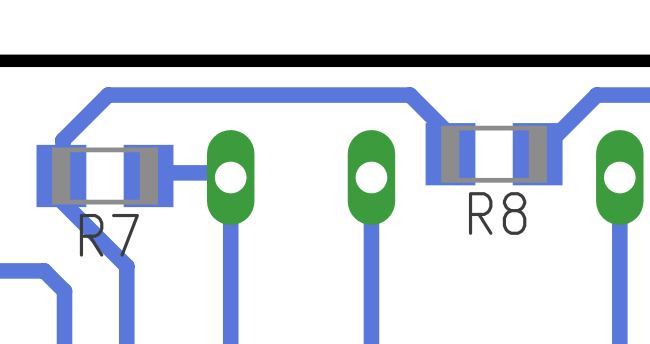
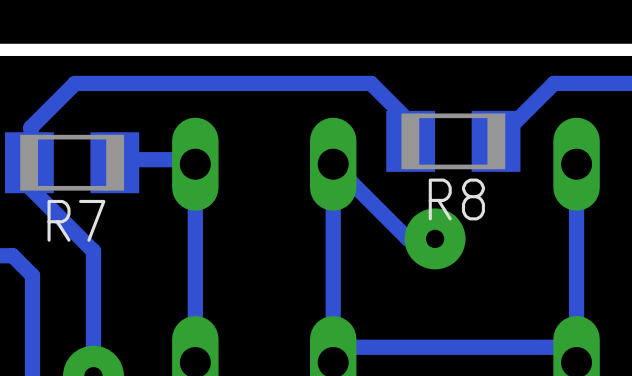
track: none -> (333, 164) (407, 238) (435, 238)
via: none -> (435, 238)

